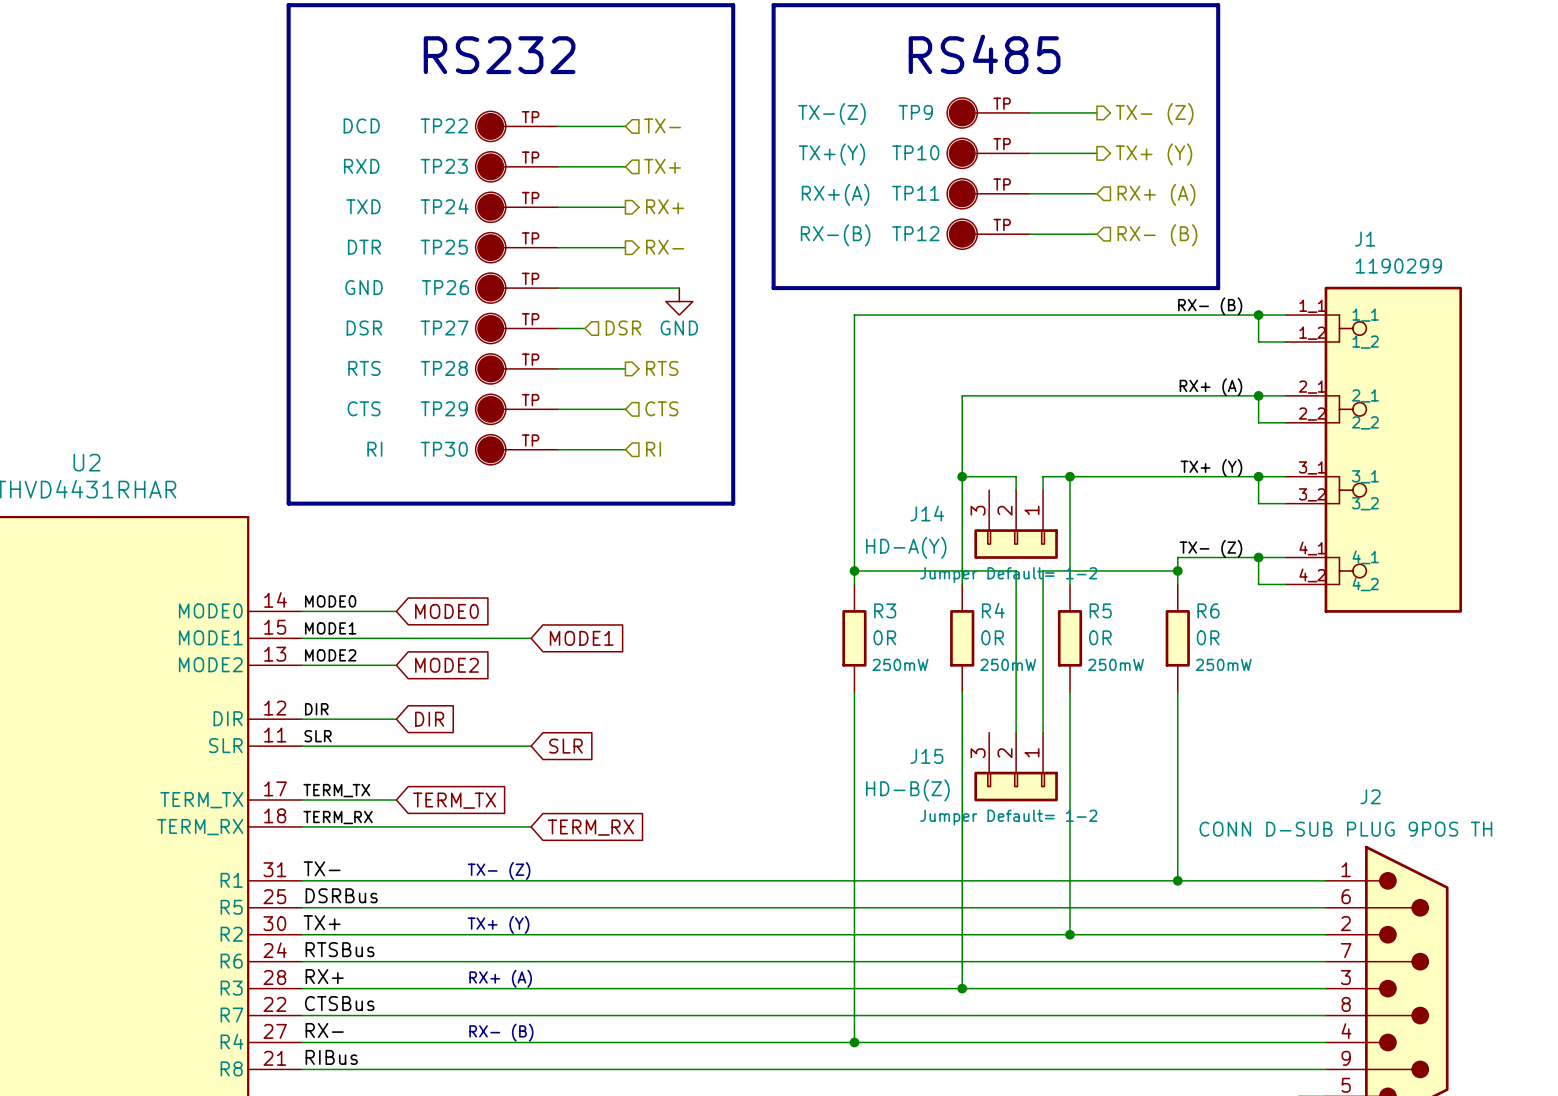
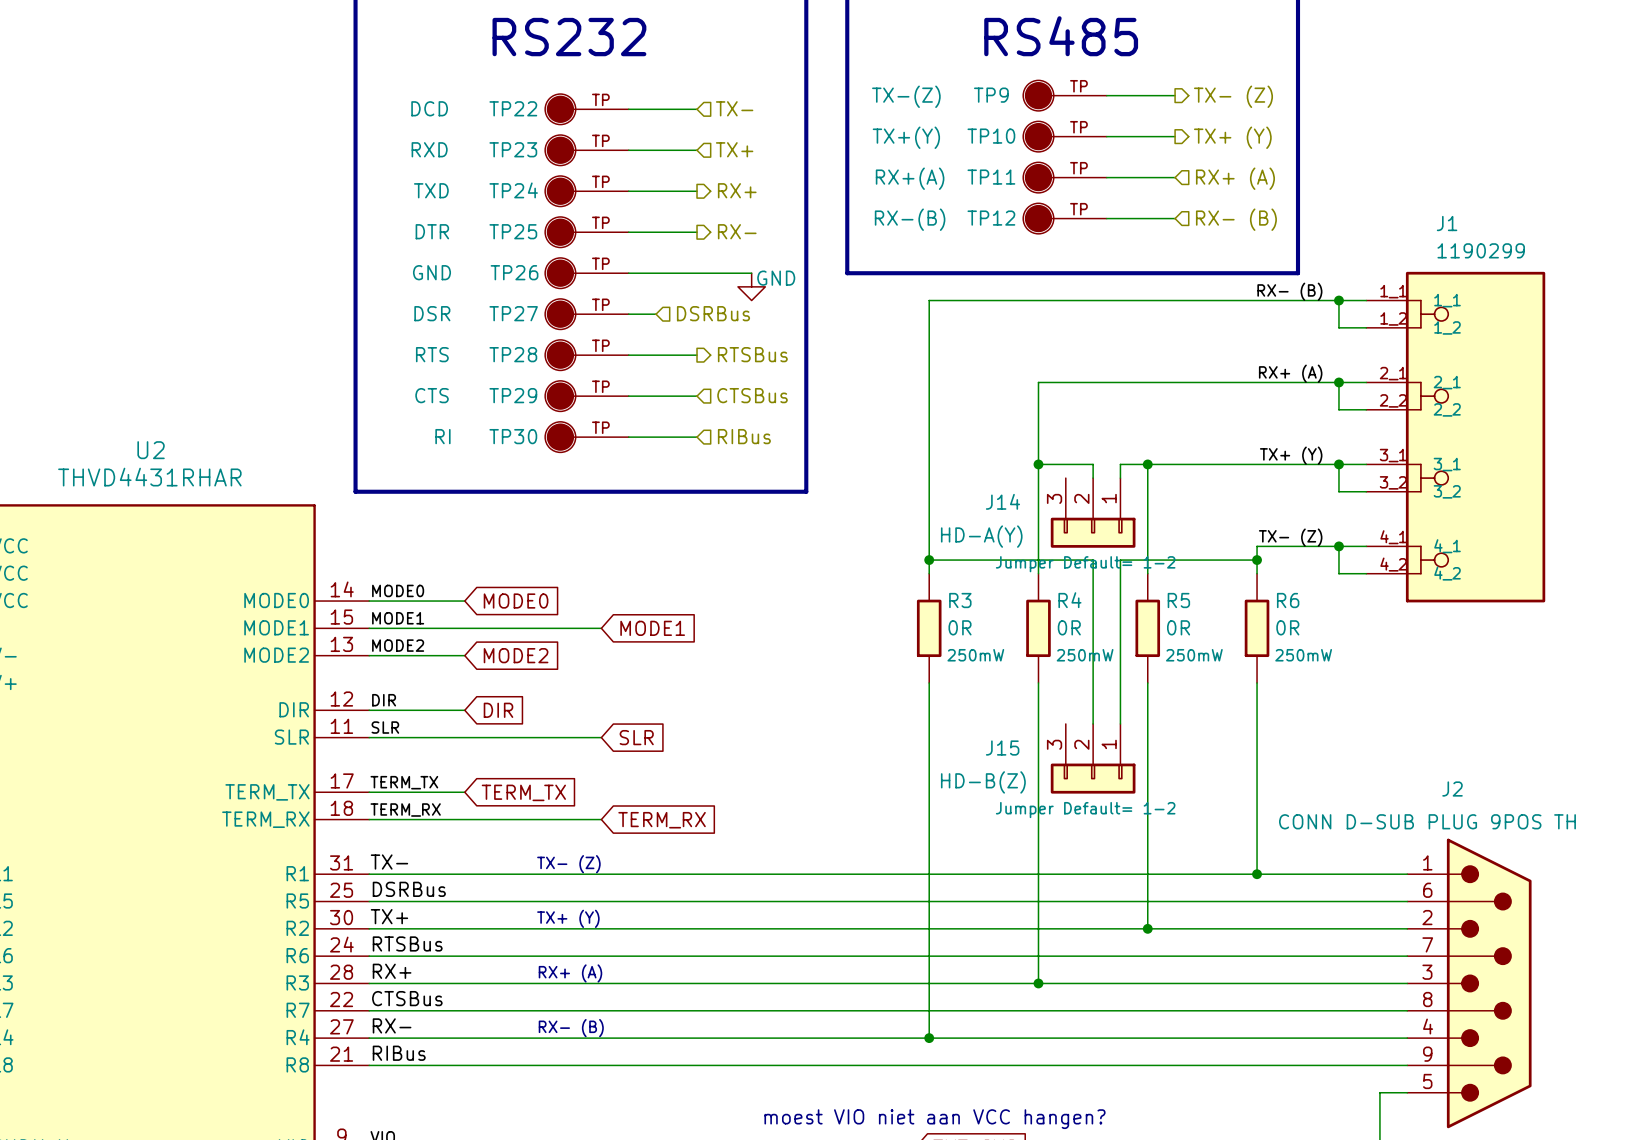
hierarchical label: DSR (623, 328) -> DSRBus (713, 313)
power symbol text position: GND (679, 328) -> GND (776, 278)
hierarchical label: RTS (662, 368) -> RTSBus (752, 354)
hierarchical label: CTS (661, 408) -> CTSBus (752, 395)
hierarchical label: RI (653, 449) -> RIBus (744, 436)

